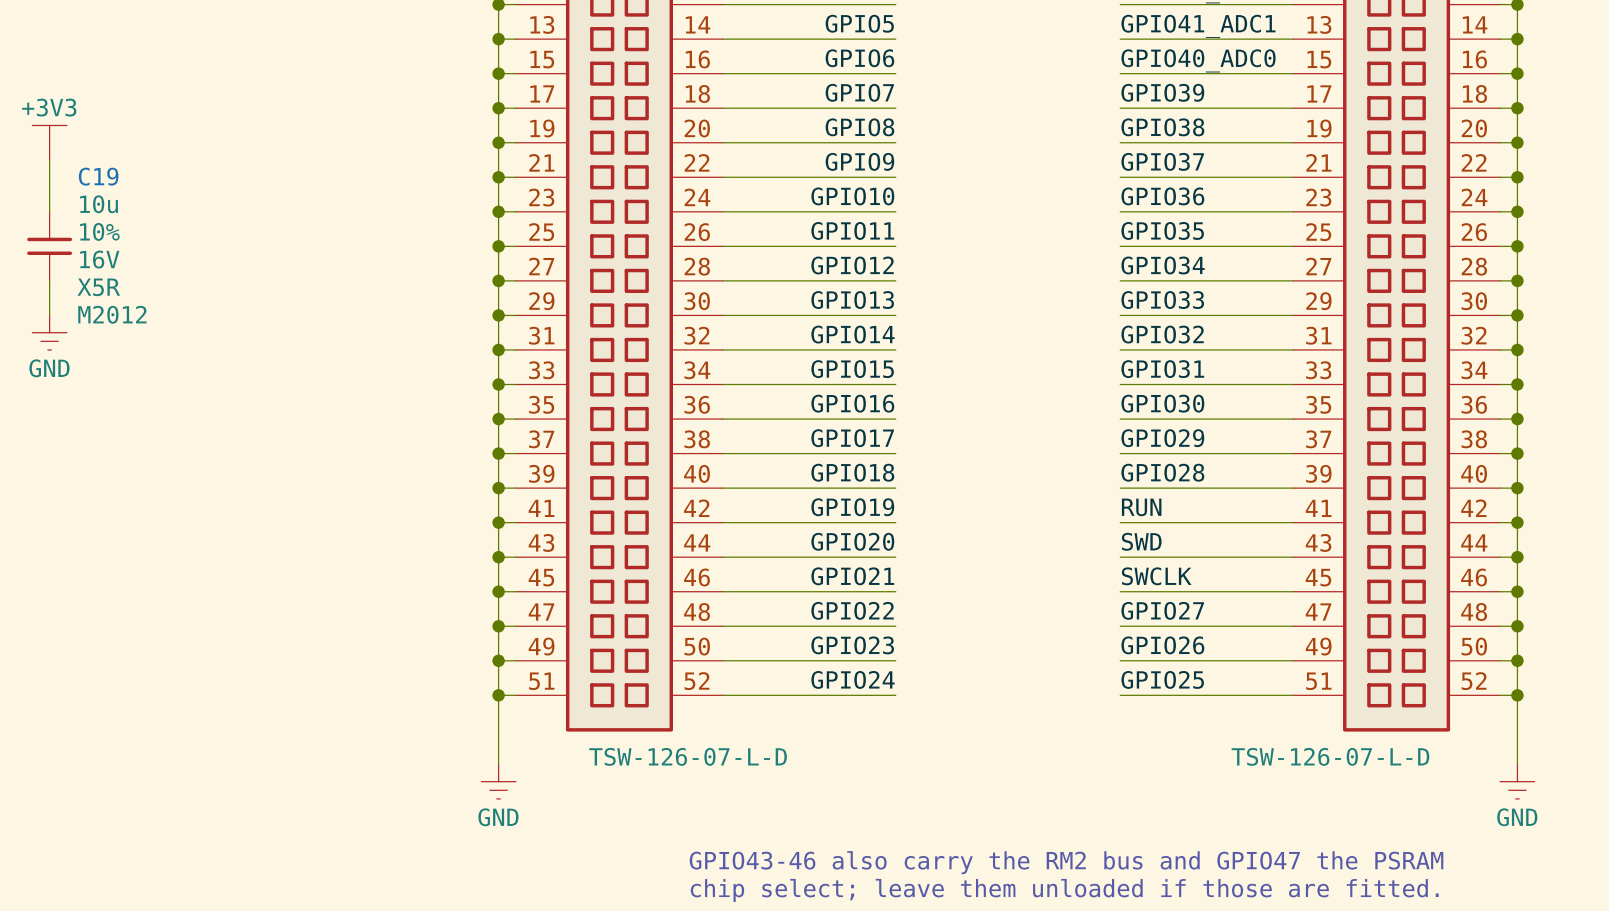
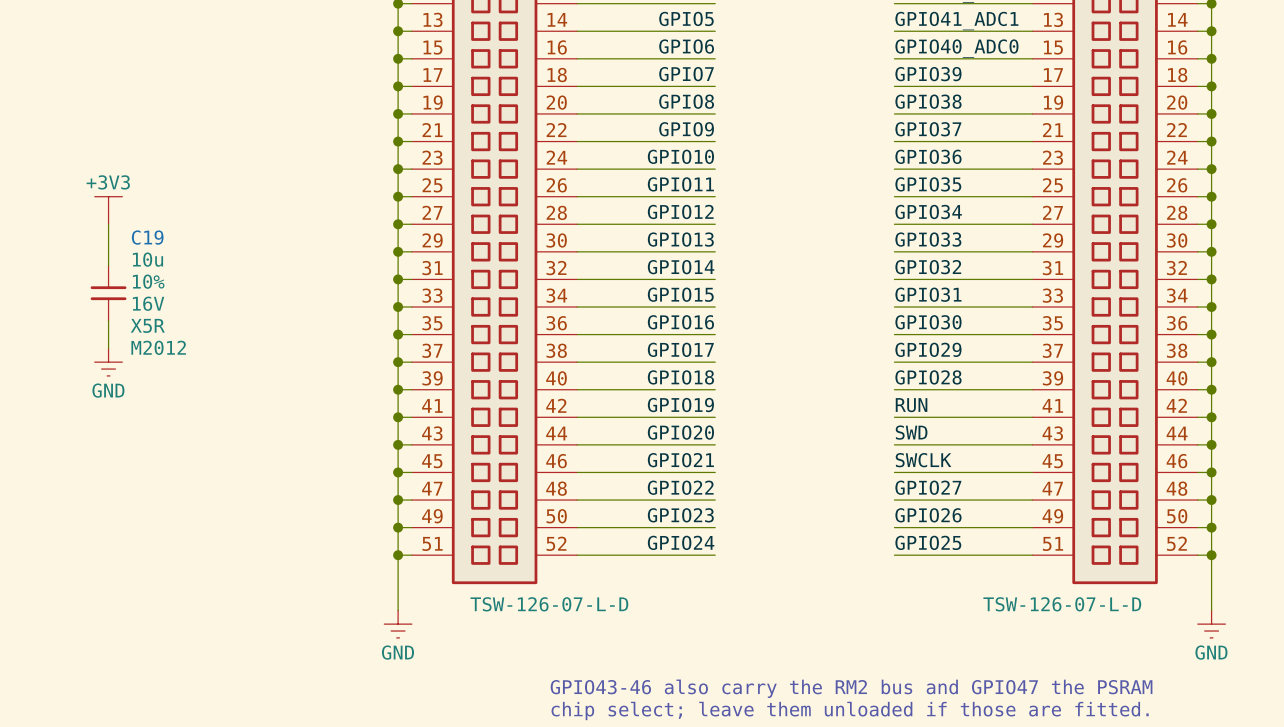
power symbol position: +3V3 (49, 142) -> +3V3 (108, 210)
wire: (49, 160) (49, 211) -> (108, 224) (108, 265)
C19 position: (49, 246) -> (108, 293)
wire: (49, 280) (49, 315) -> (108, 320) (108, 348)
power symbol position: GND (49, 332) -> GND (108, 362)

